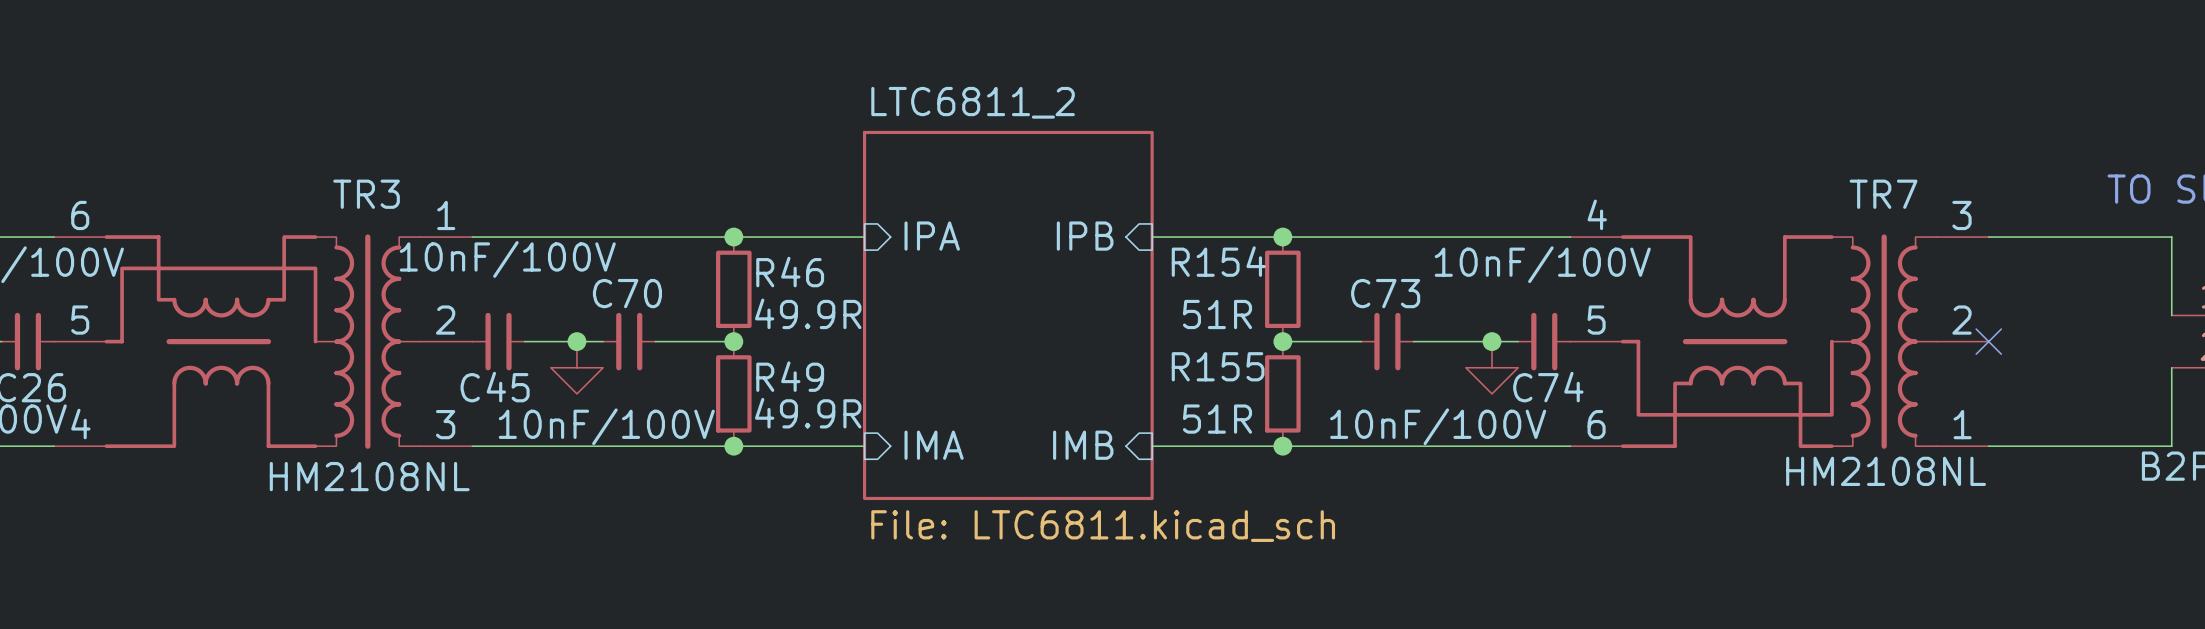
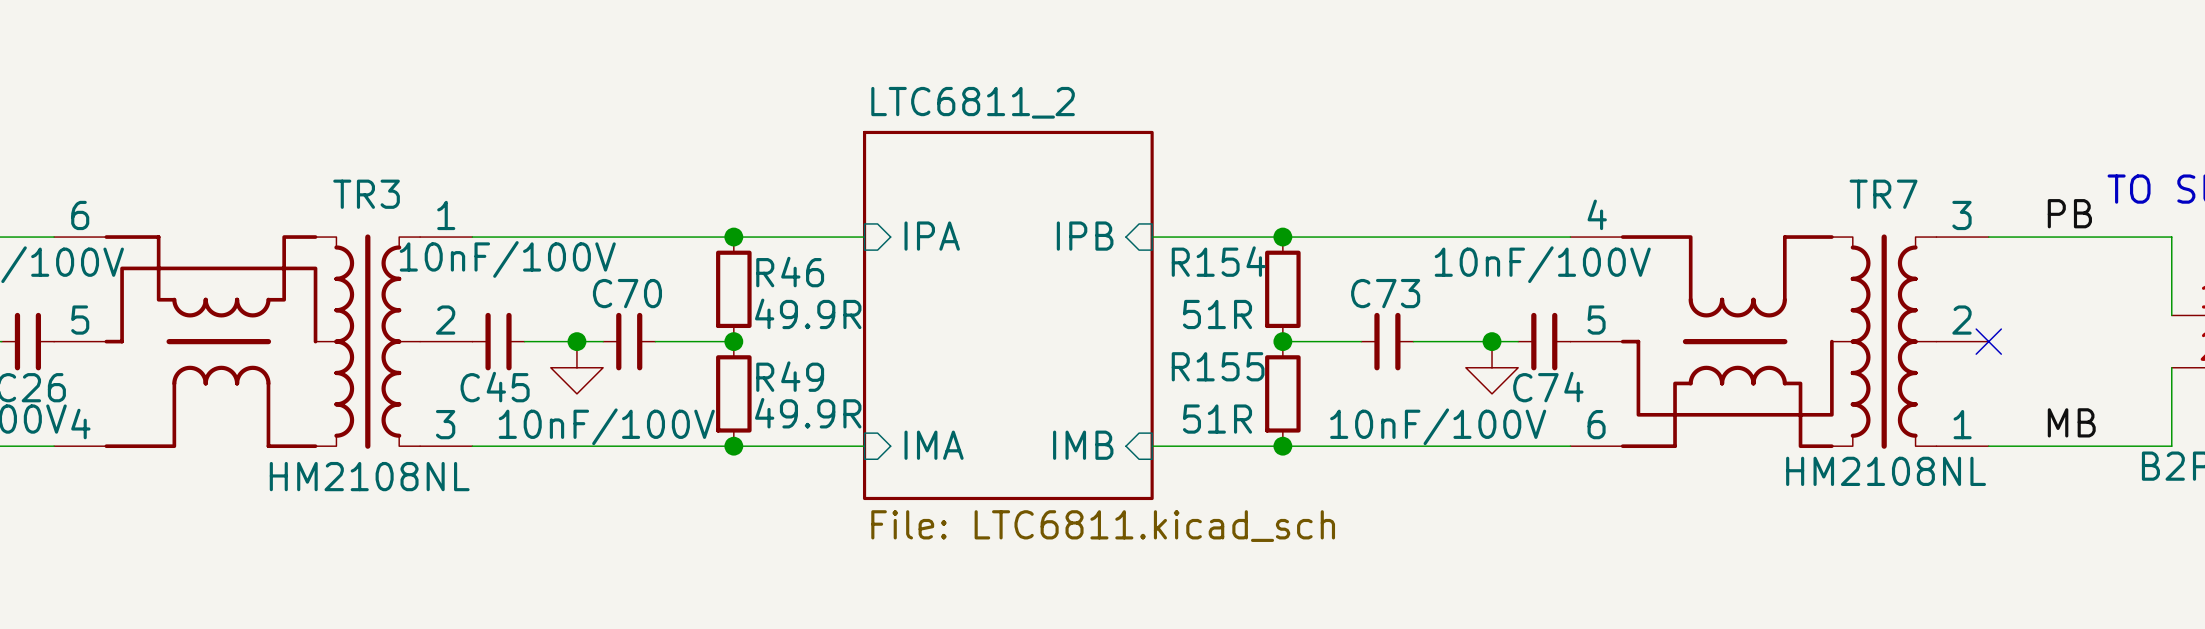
label: none -> PB (2069, 213)
label: none -> MB (2071, 422)

